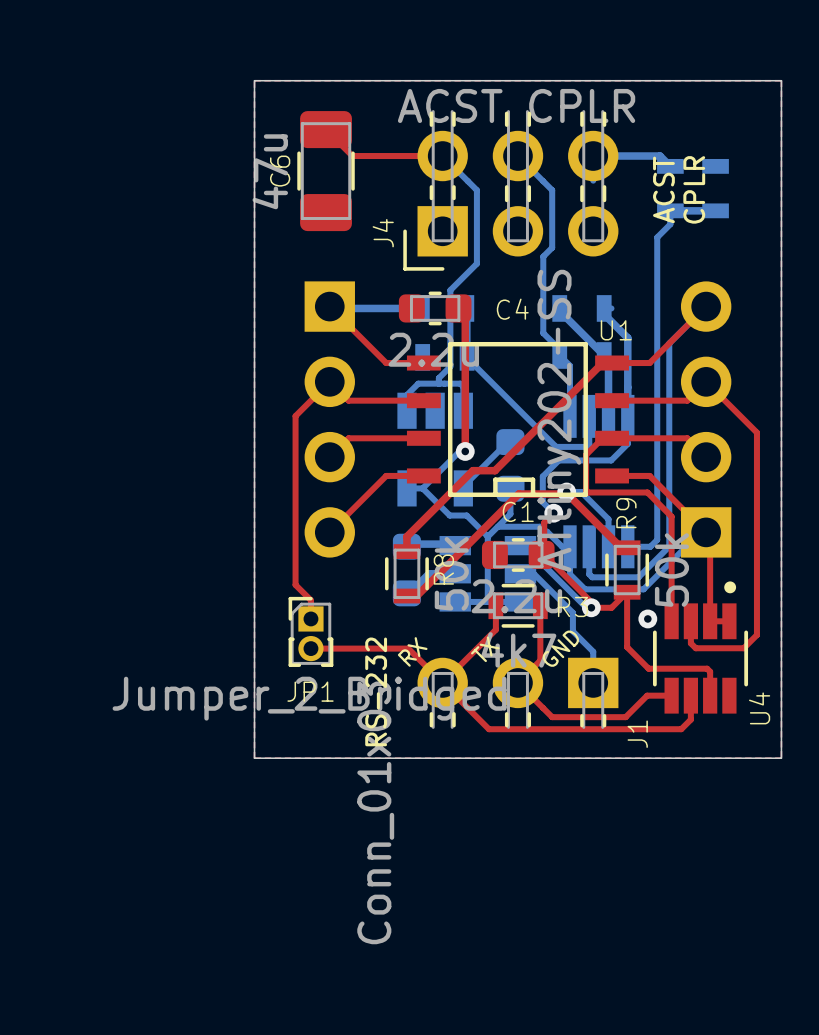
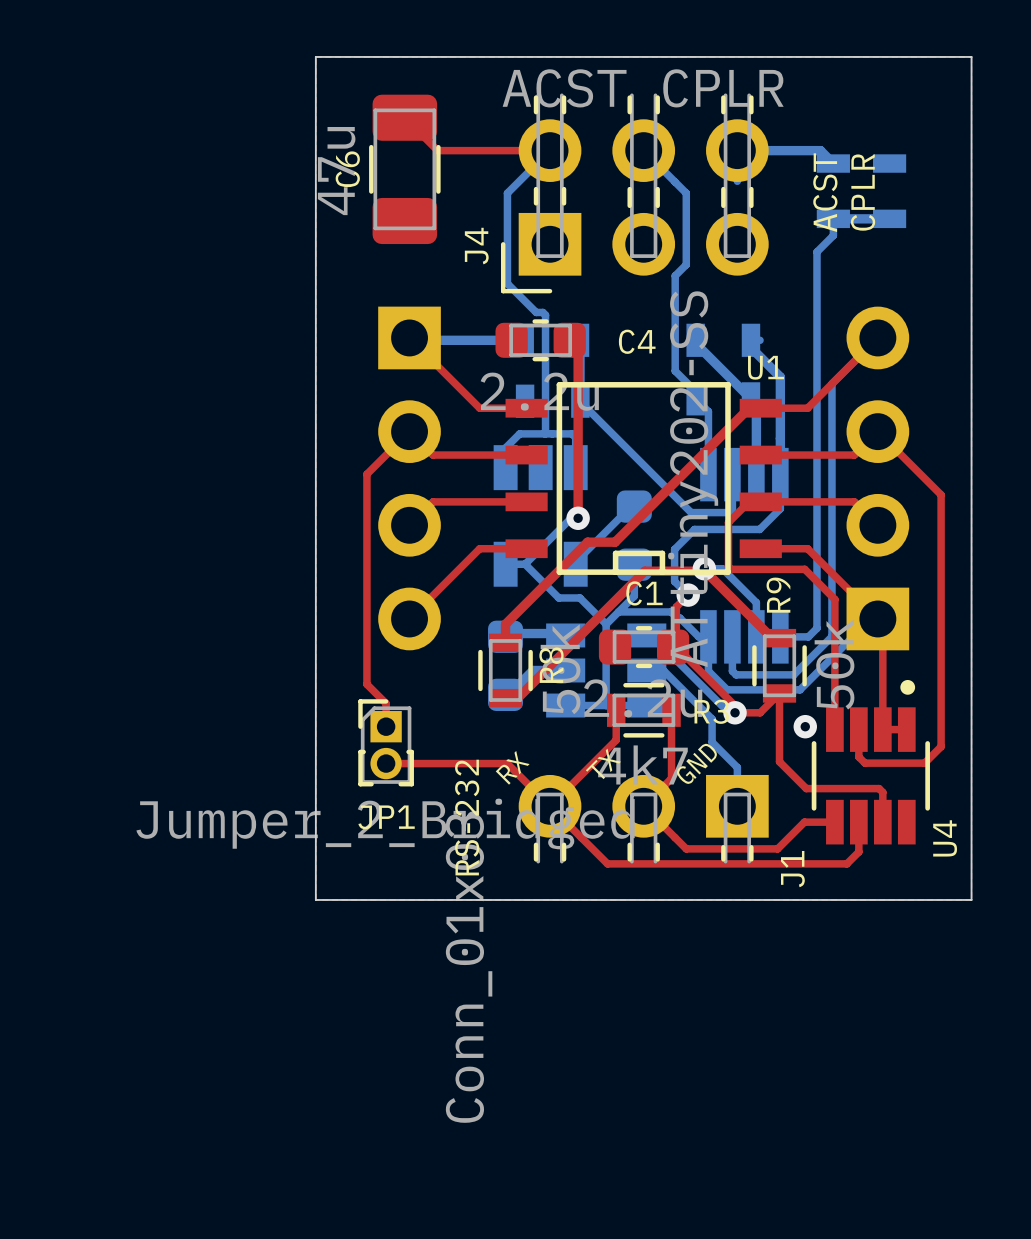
bottom track: (442, 156) (476, 190) (476, 263) (450, 290) (450, 366) (438, 378) (438, 383) -> (550, 150) (507, 193) (507, 283) (536, 312) (542, 312) (545, 315) (545, 433)

